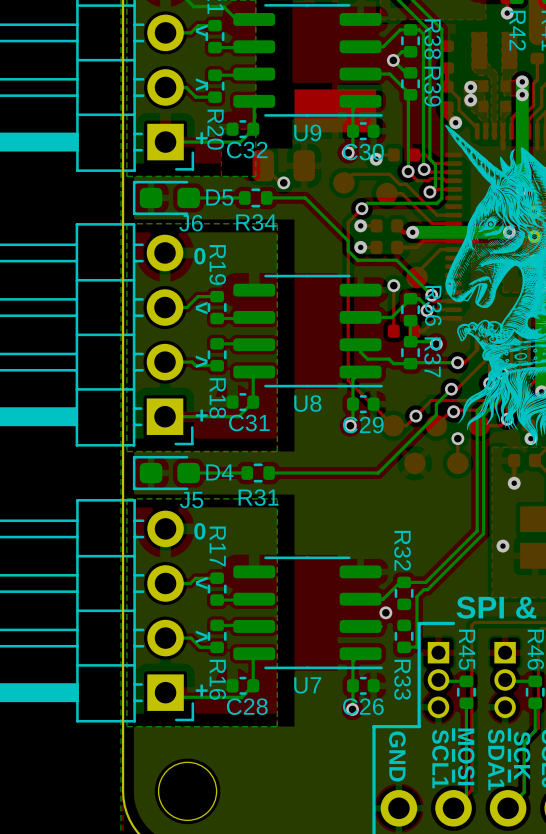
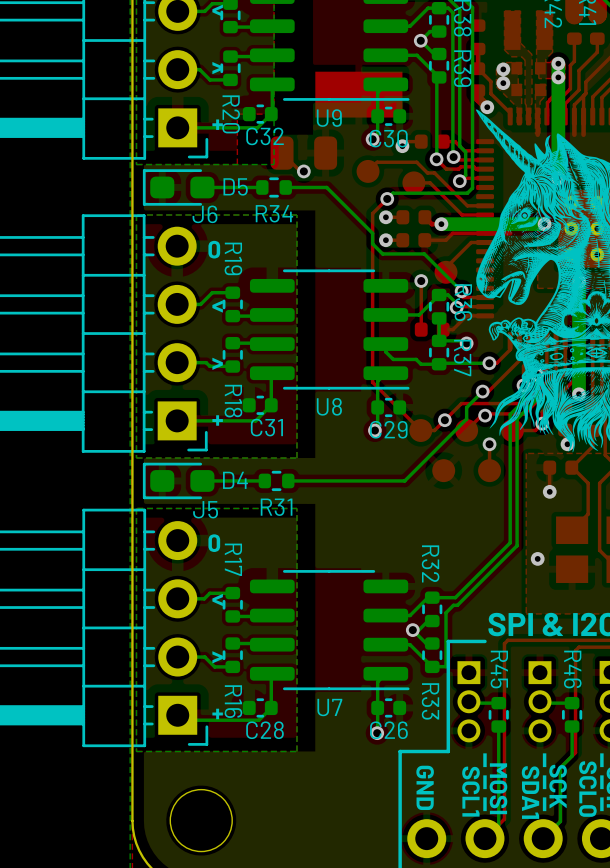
bottom track: none -> (432, 621) (427, 621) (415, 633) (426, 643) (432, 643)
bottom track: none -> (407, 644) (432, 666)

